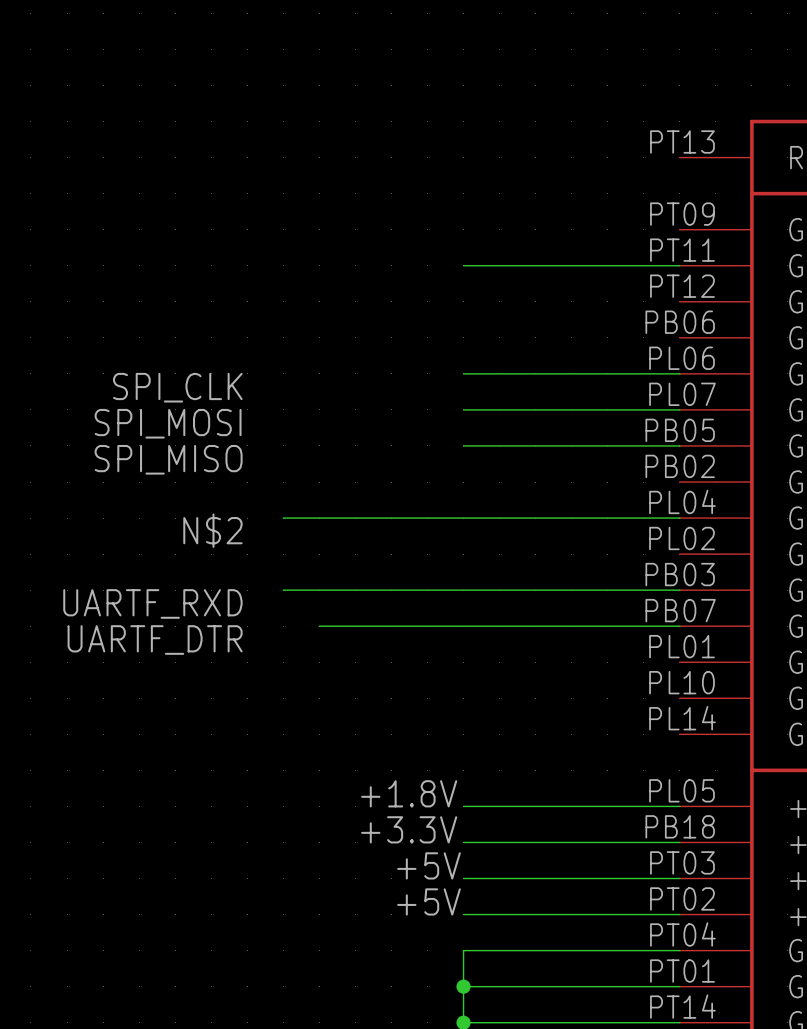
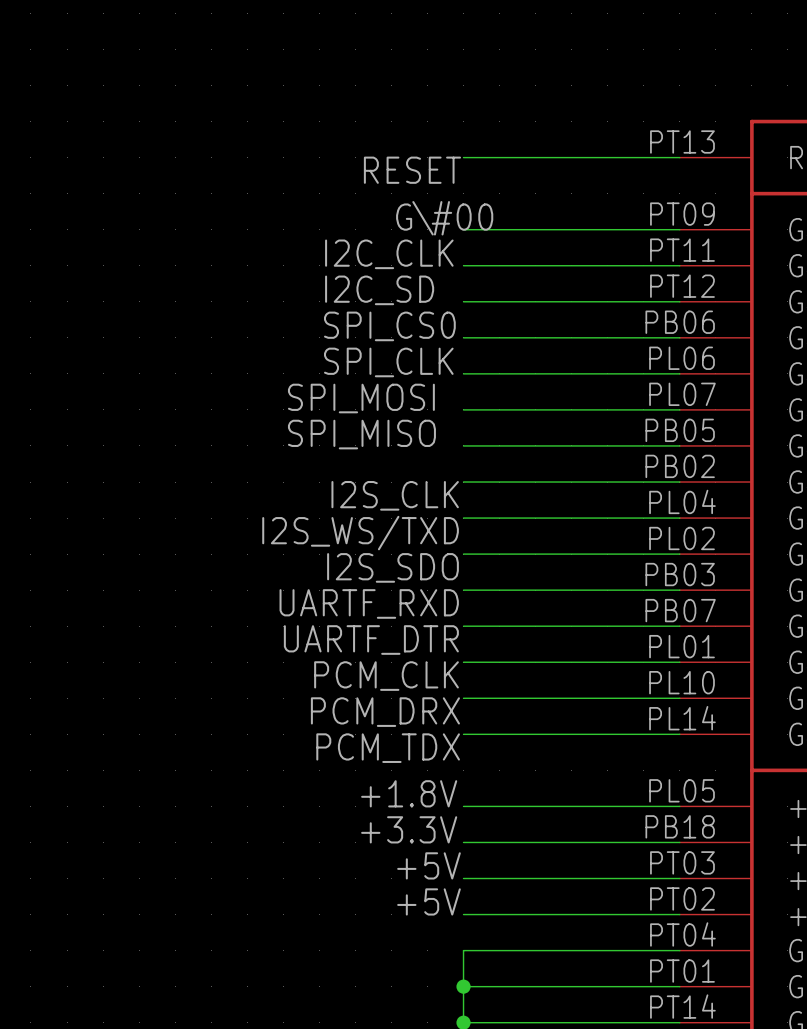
wire: none -> (463, 157) (679, 157)
label: none -> RESET (412, 170)
label: none -> G\#00 (444, 218)
wire: none -> (463, 229) (679, 229)
label: none -> I2C_CLK (389, 254)
label: none -> I2C_SD (379, 290)
wire: none -> (463, 301) (679, 301)
label: none -> SPI_CS0 (389, 326)
wire: none -> (463, 337) (679, 337)
label position: SPI_CLK (177, 387) -> SPI_CLK (388, 362)
label position: SPI_MOSI (168, 423) -> SPI_MOSI (361, 398)
label position: SPI_MISO (168, 459) -> SPI_MISO (361, 434)
wire: none -> (463, 482) (679, 482)
label: none -> I2S_CLK (395, 495)
wire: (283, 518) (463, 518) -> none
label: N$2 (212, 530) -> none
label: none -> I2S_WS/TXD (360, 533)
wire: none -> (463, 554) (679, 554)
label: none -> I2S_SDO (392, 567)
wire: (283, 590) (463, 590) -> none
label position: UARTF_RXD (152, 603) -> UARTF_RXD (369, 603)
wire: (319, 626) (463, 626) -> none
label position: UARTF_DTR (155, 640) -> UARTF_DTR (371, 640)
wire: none -> (463, 662) (679, 662)
label: none -> PCM_CLK (386, 676)
wire: none -> (463, 698) (679, 698)
label: none -> PCM_DRX (385, 712)
wire: none -> (463, 734) (679, 734)
label: none -> PCM_TDX (388, 748)

